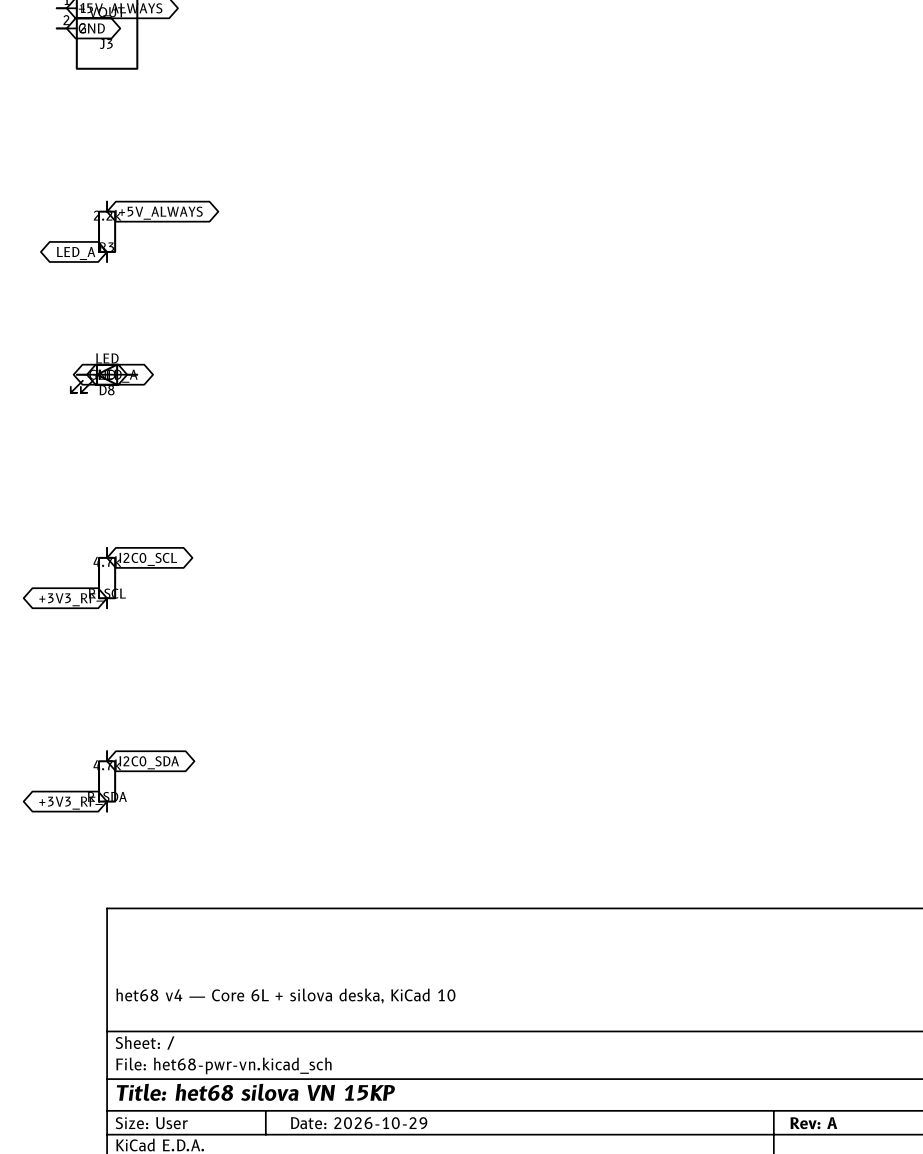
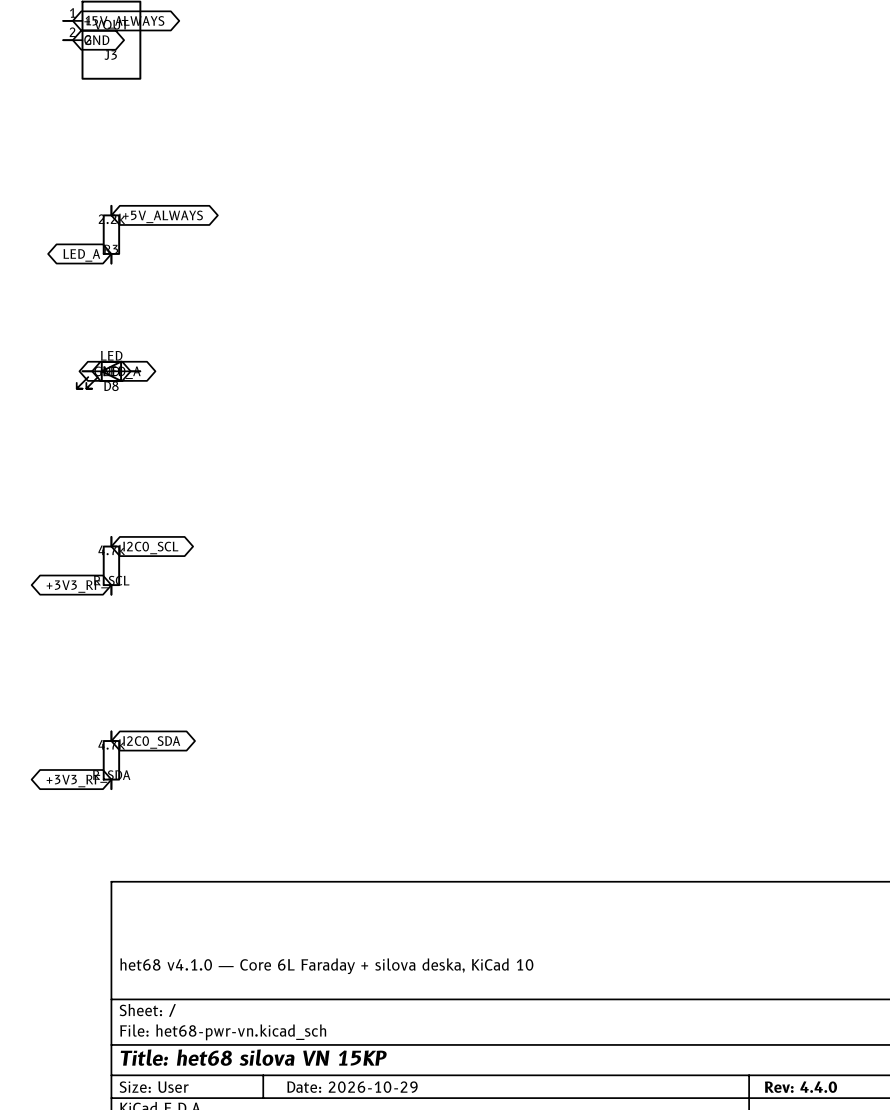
title block: het68 v4 — Core 6L + silova deska, KiCad 10 (285, 996) -> het68 v4.1.0 — Core 6L Faraday + silova deska, KiCad 10 (326, 966)
title block: Rev: A (813, 1123) -> Rev: 4.4.0 (800, 1087)

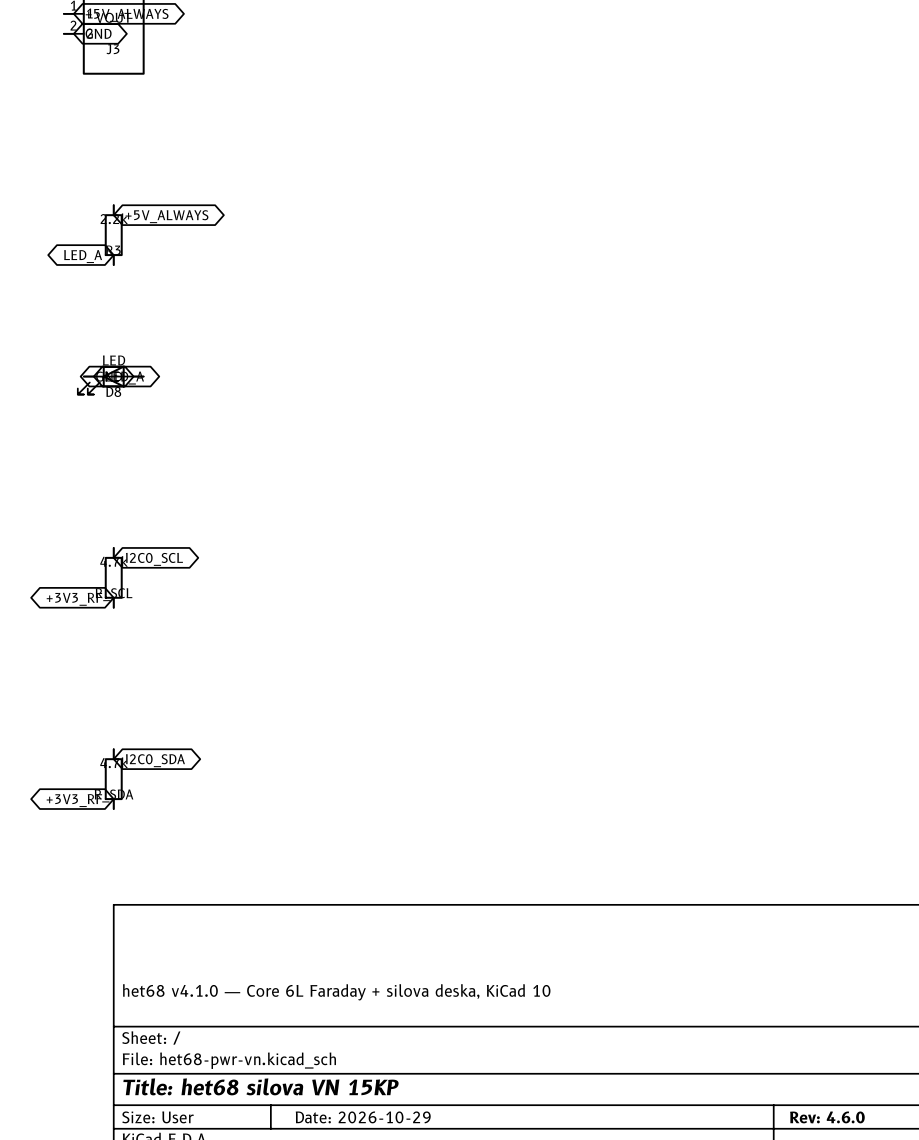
title block: Rev: 4.4.0 (800, 1087) -> Rev: 4.6.0 (827, 1117)

